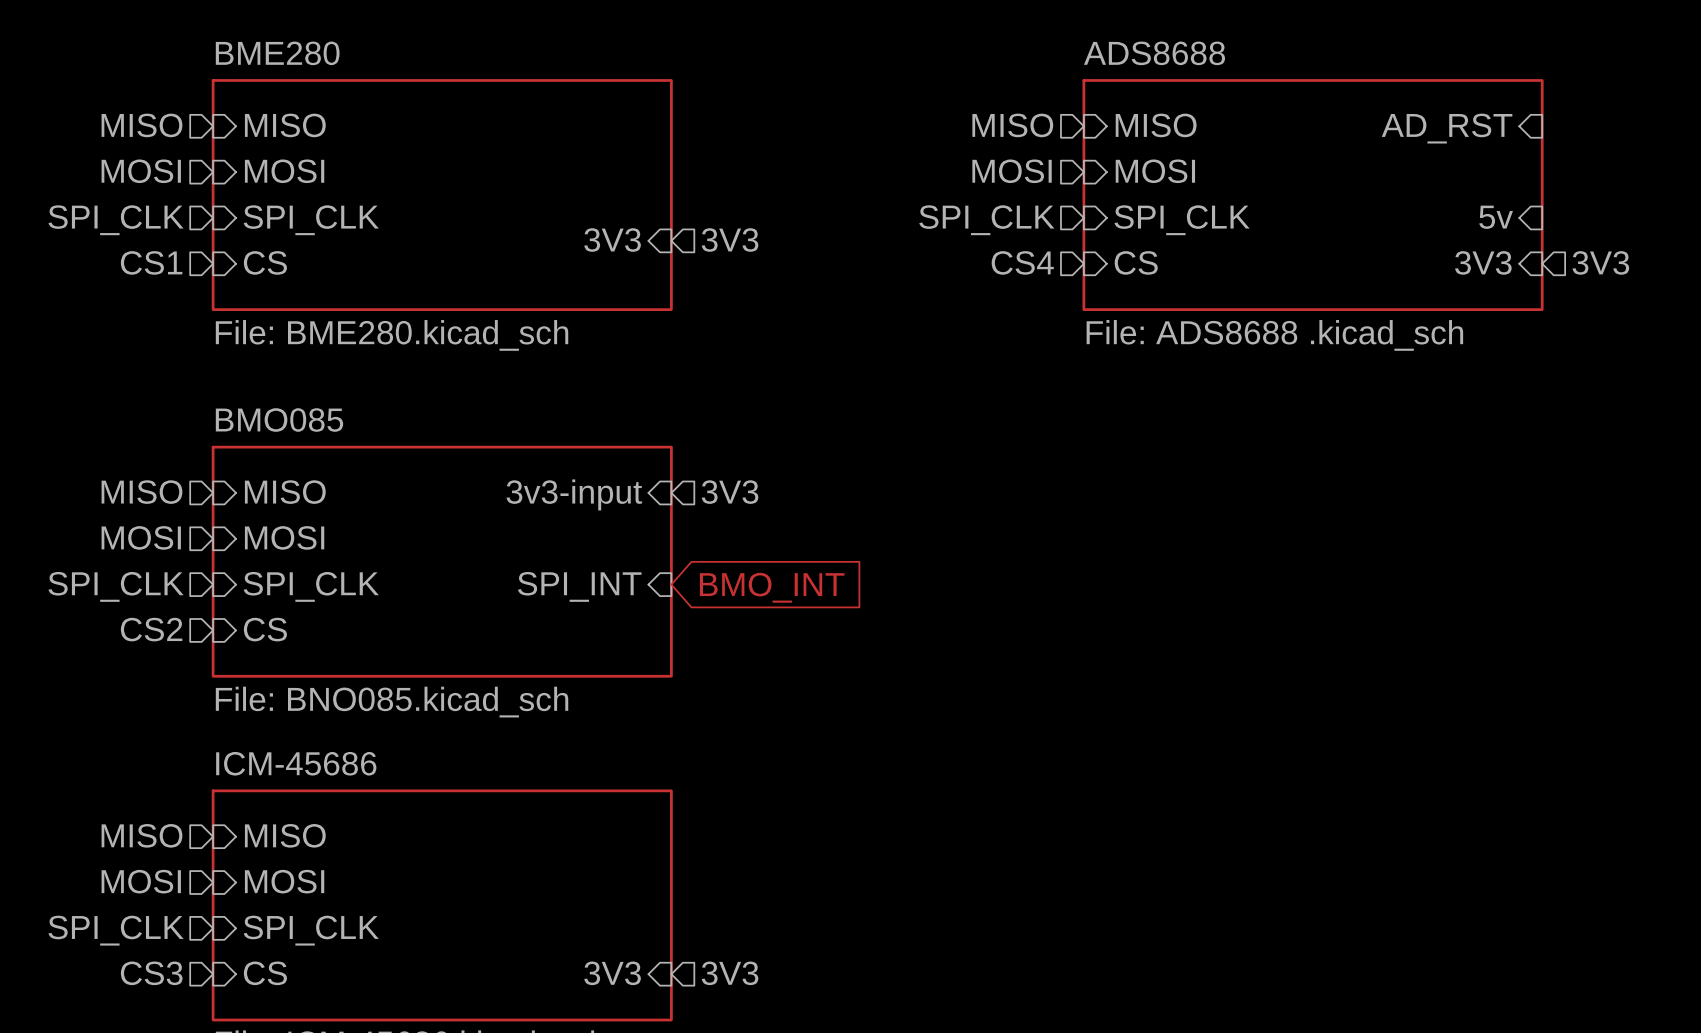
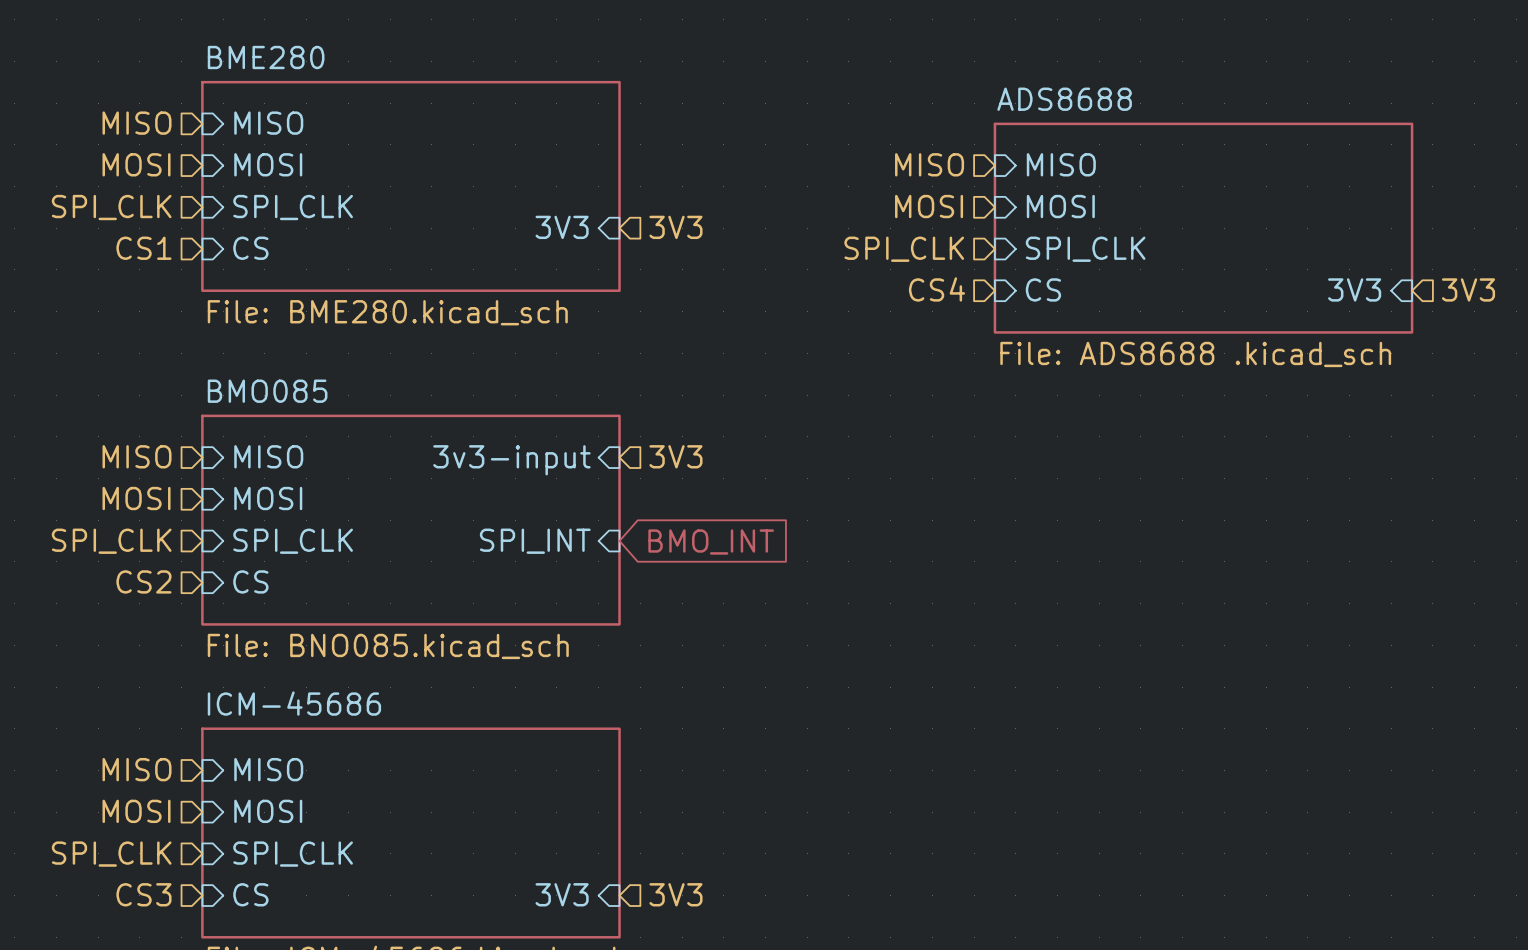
hierarchical label: MISO (1012, 125) -> none
sheet pin: MISO (1156, 125) -> none
sheet pin: AD_RST (1447, 128) -> none
hierarchical label: MOSI (1012, 171) -> MISO (929, 164)
sheet pin: MOSI (1155, 171) -> MISO (1061, 164)
sheet ADS8688 position: (1313, 195) -> (1203, 228)
sheet pin: 5v (1496, 217) -> none
hierarchical label: SPI_CLK (986, 220) -> MOSI (929, 206)
sheet pin: SPI_CLK (1182, 220) -> MOSI (1060, 206)
hierarchical label: CS4 (1022, 262) -> SPI_CLK (904, 249)
sheet pin: CS (1136, 262) -> SPI_CLK (1085, 249)
sheet pin position: 3V3 (1483, 262) -> 3V3 (1354, 289)
hierarchical label position: 3V3 (1600, 262) -> 3V3 (1468, 289)
hierarchical label: none -> CS4 (937, 289)
sheet pin: none -> CS (1043, 289)

